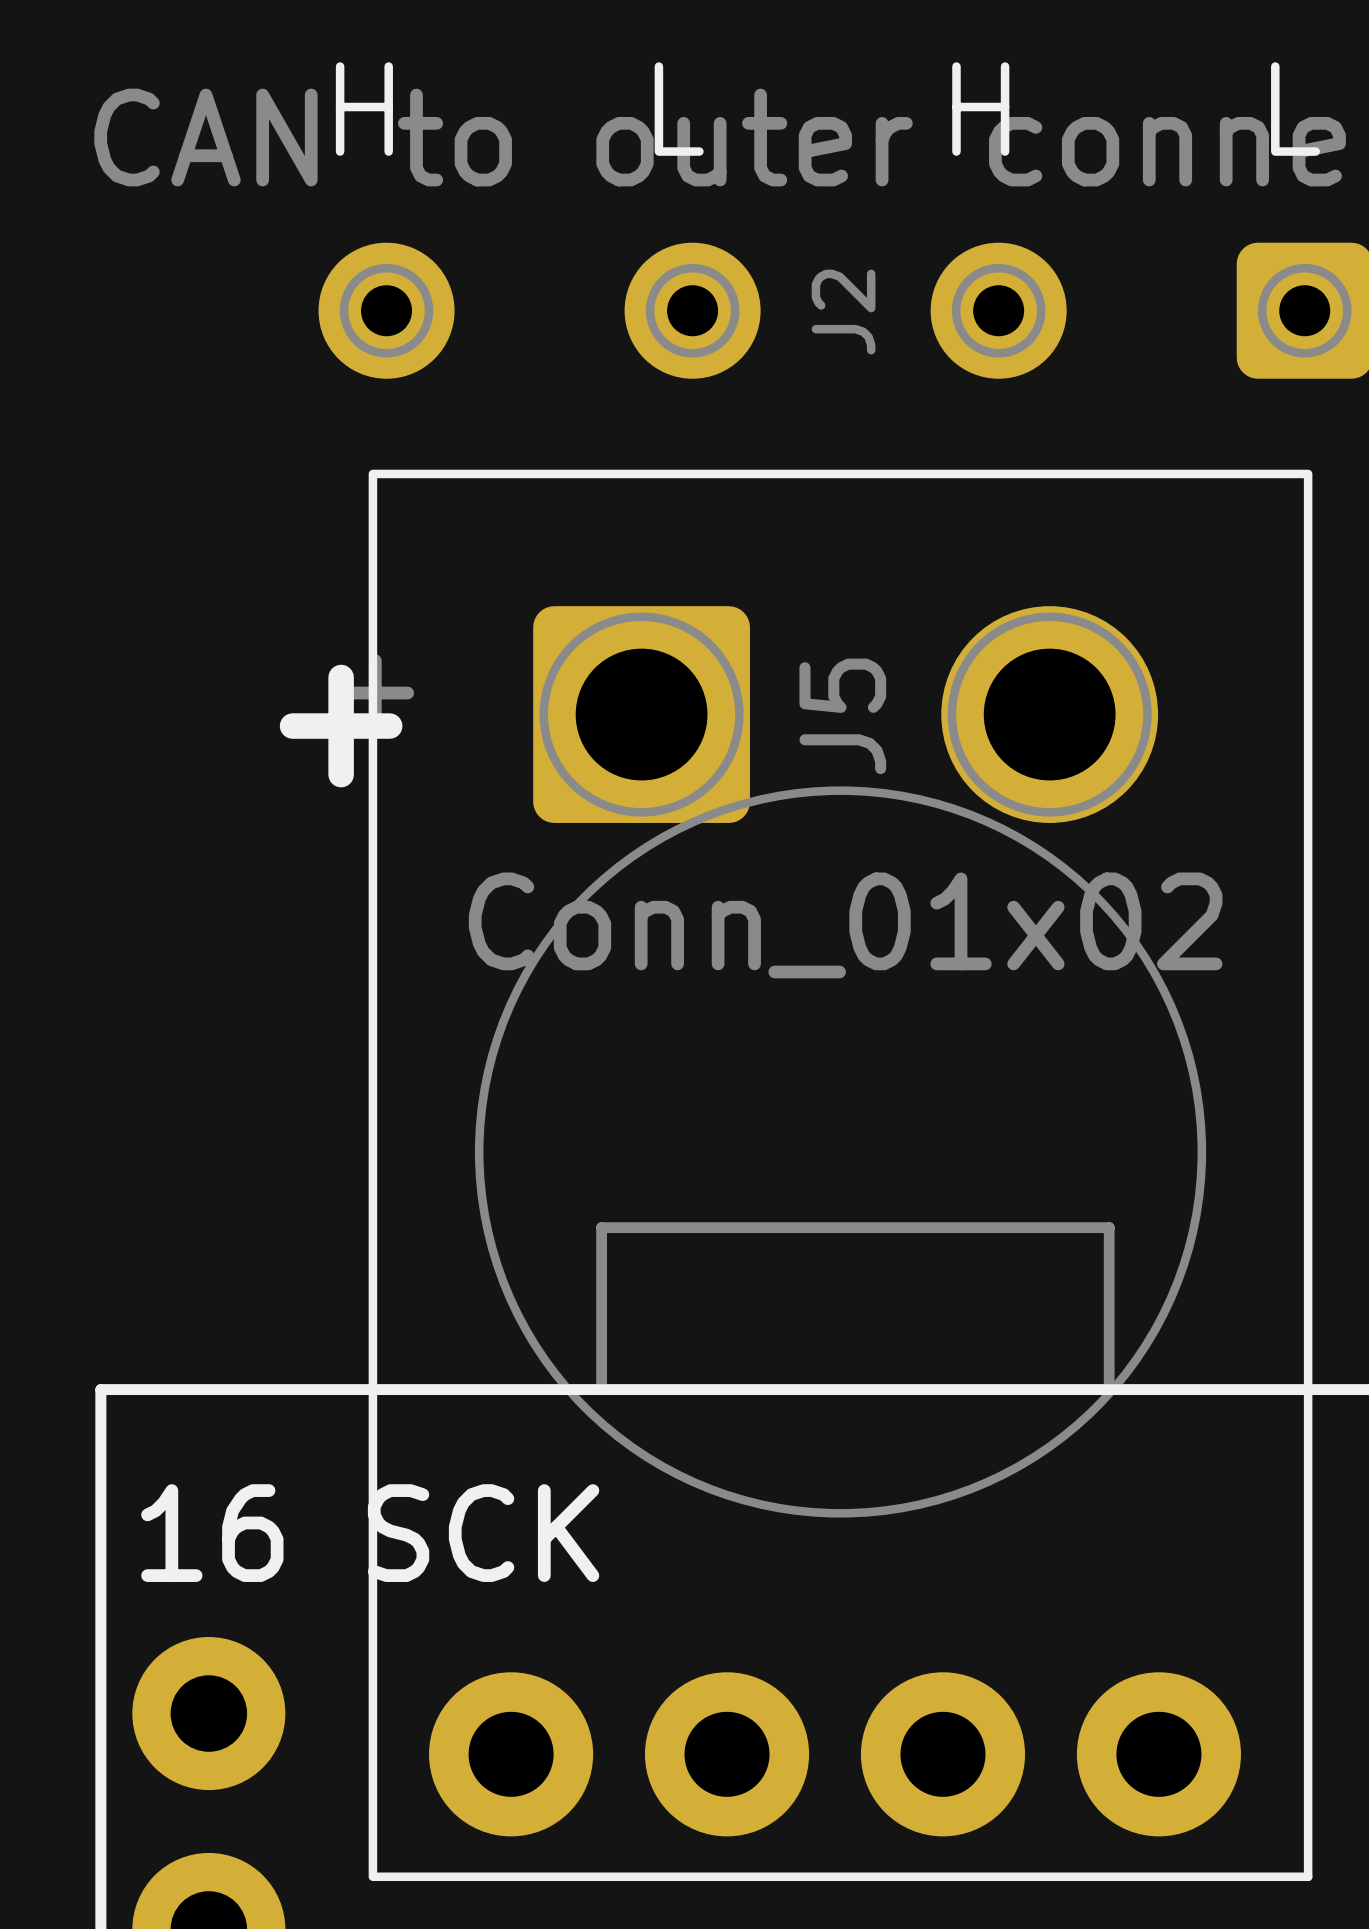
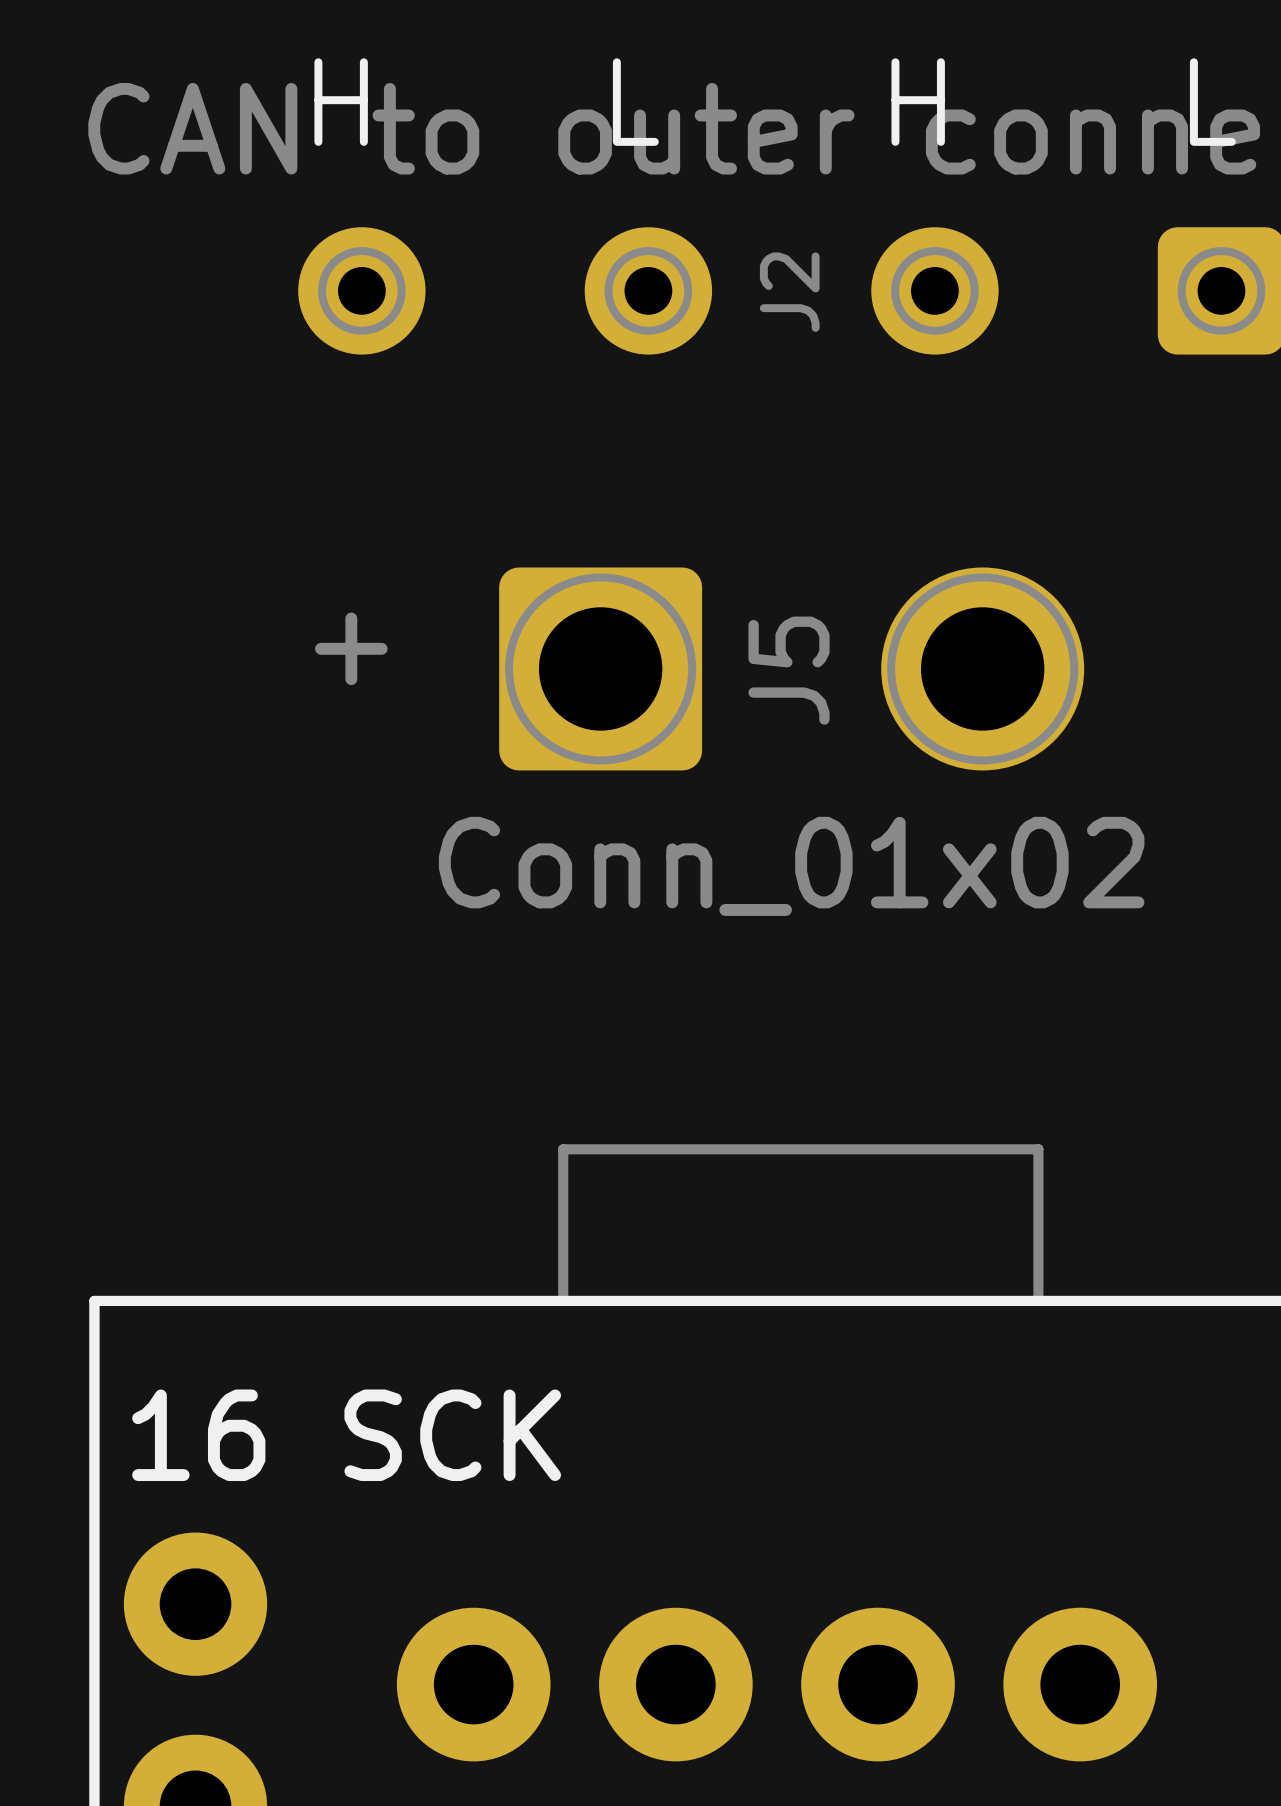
text: + (341, 726) -> none
part side: top (840, 1175) -> bottom (776, 1684)

